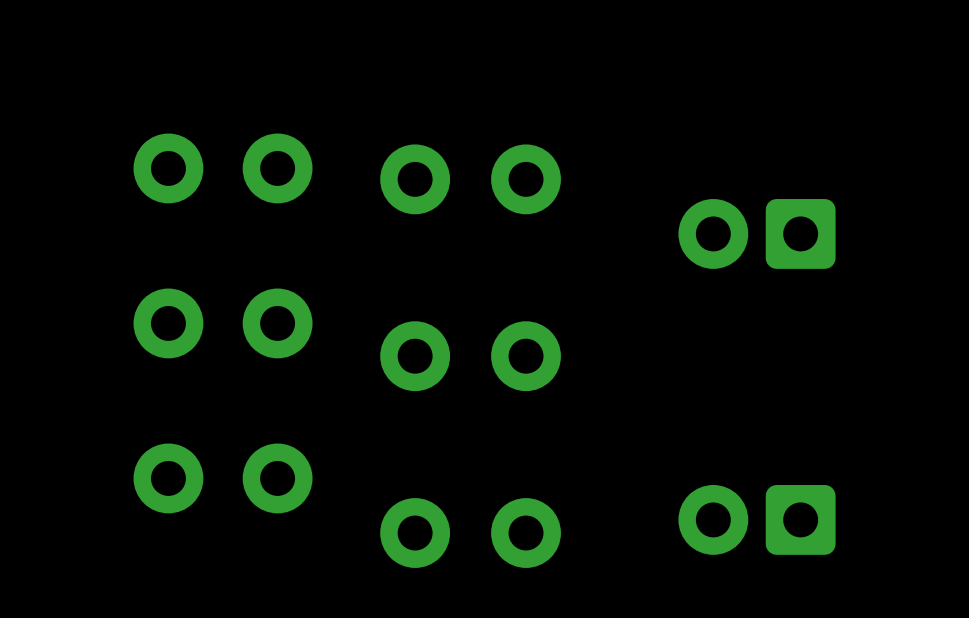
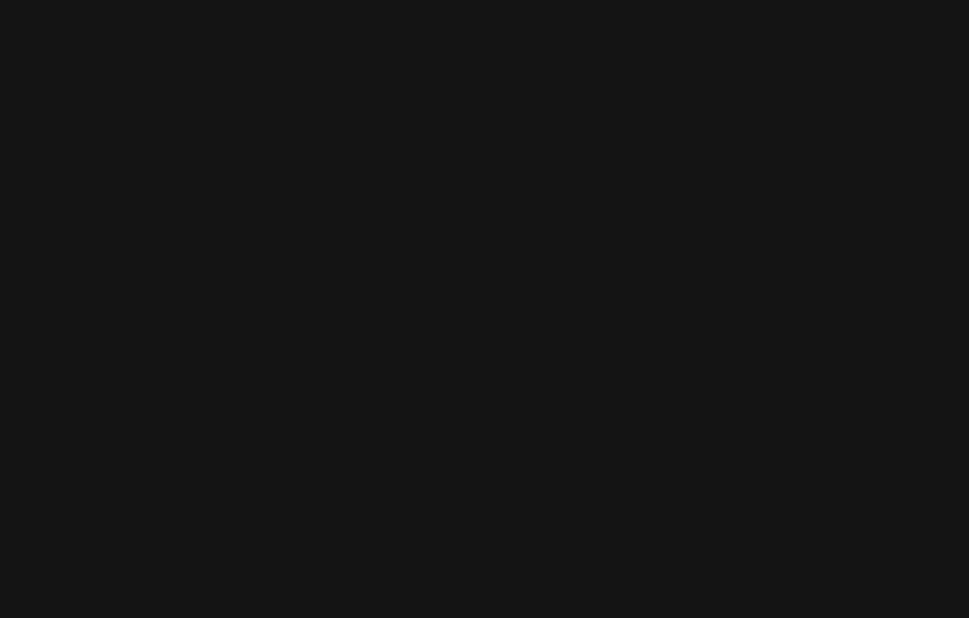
part: (223, 168) -> none
part: (470, 179) -> none
part: (757, 233) -> none
part: (223, 323) -> none
part: (470, 356) -> none
part: (223, 478) -> none
part: (757, 519) -> none
part: (470, 533) -> none

